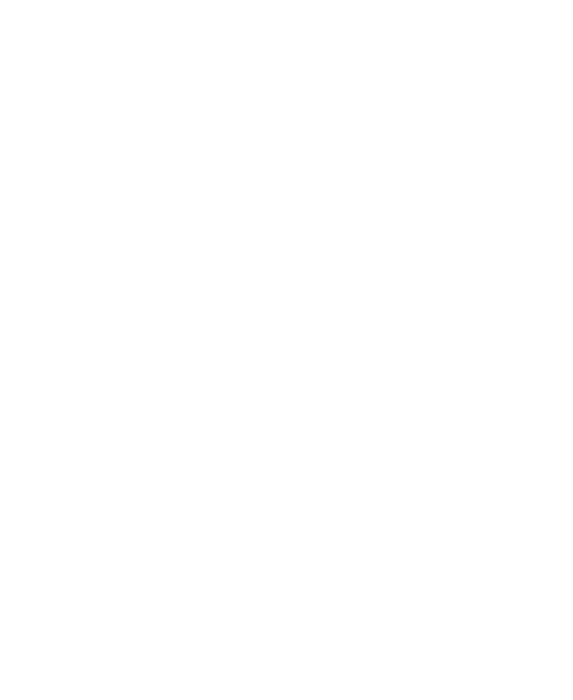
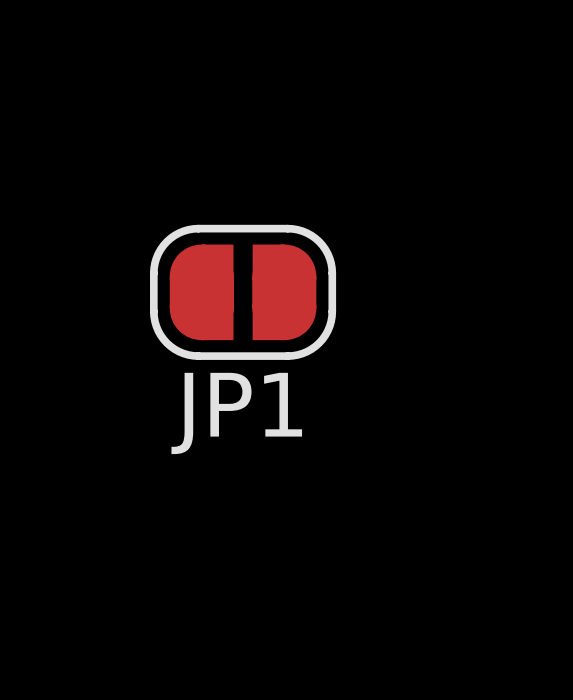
JP1: none -> (243, 292)

